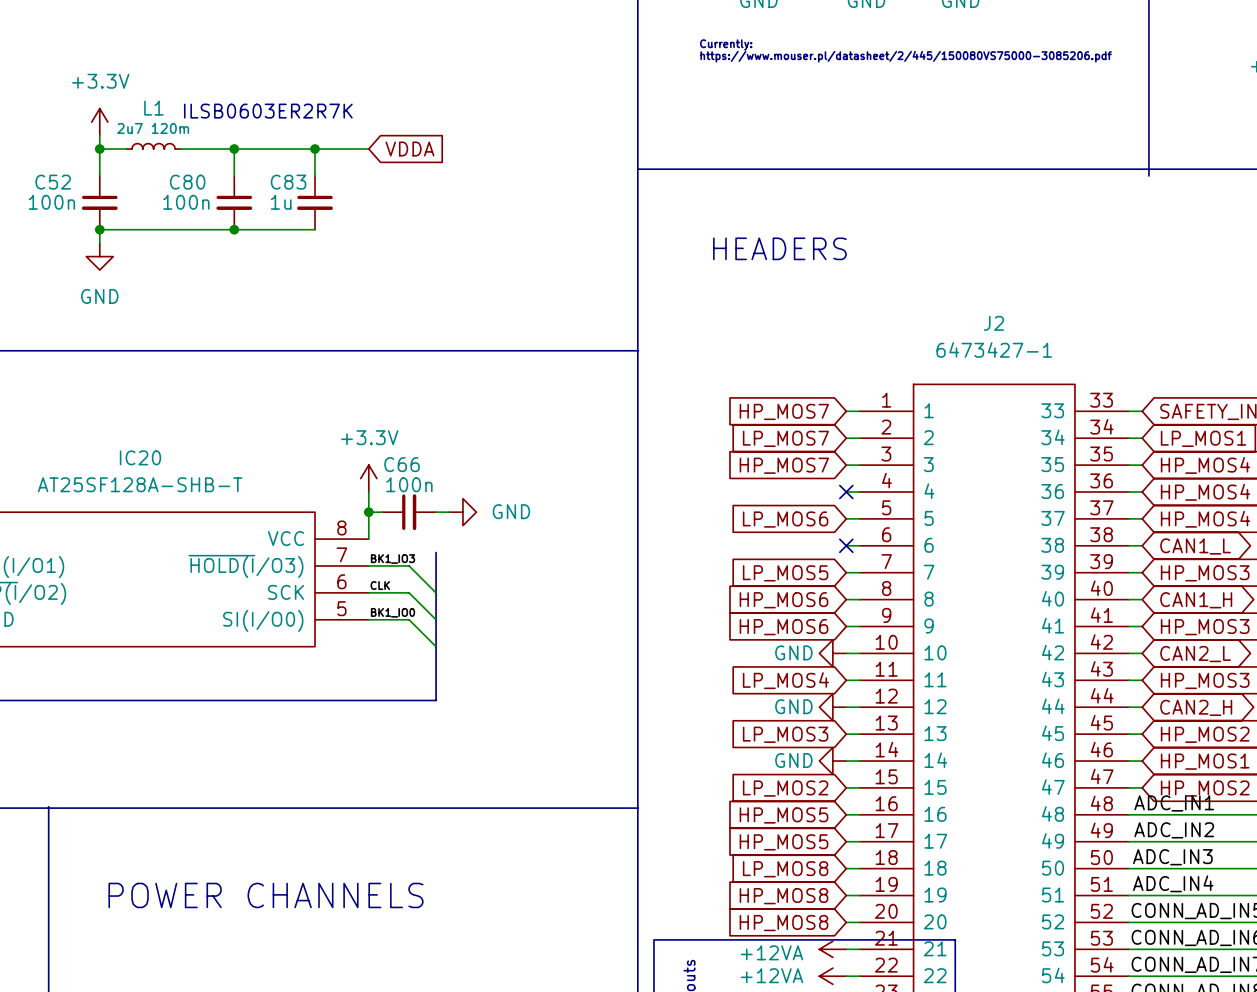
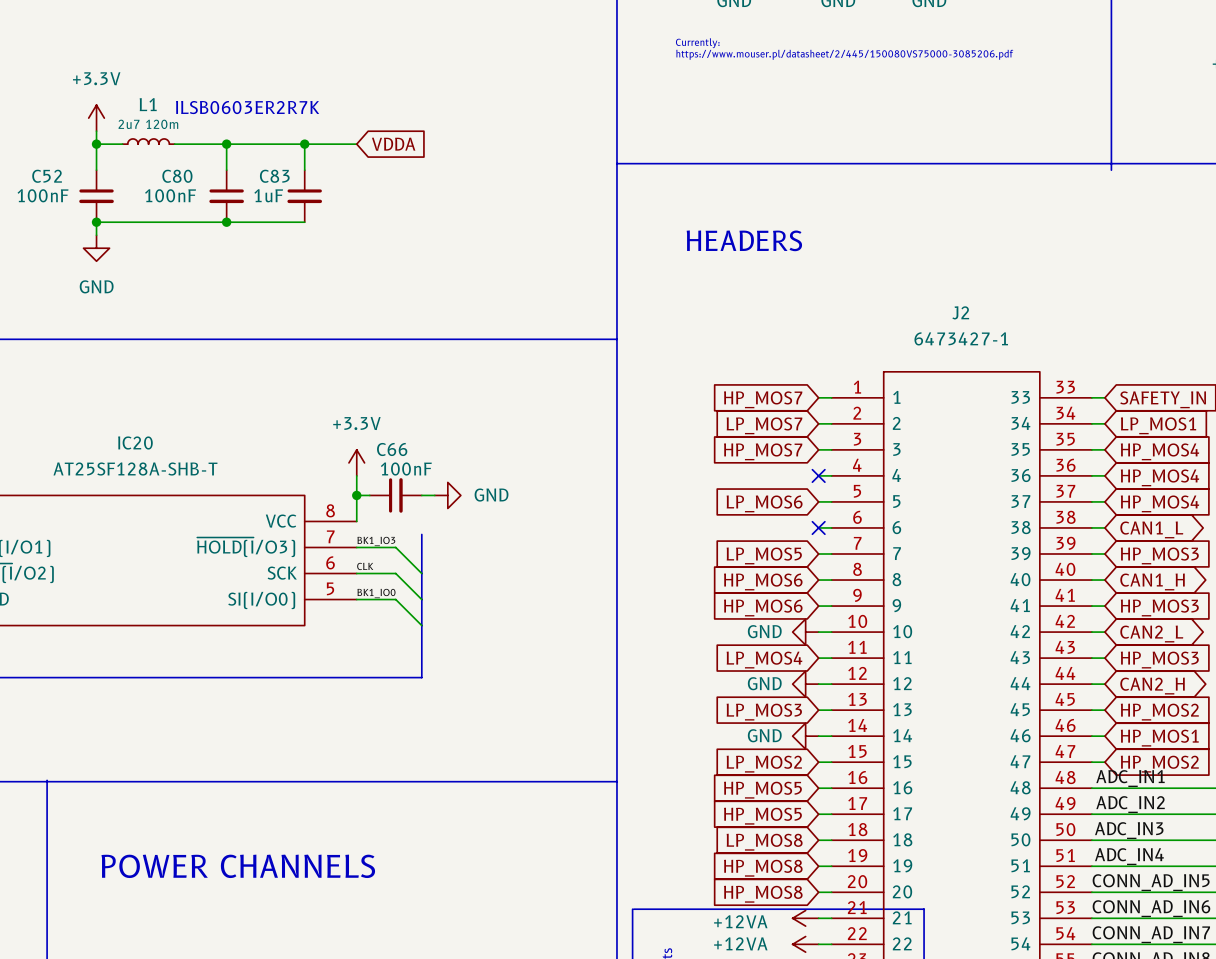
C52 value: 100n (51, 202) -> 100nF (43, 195)
C80 value: 100n (186, 202) -> 100nF (170, 195)
C83 value: 1u (281, 202) -> 1uF (268, 195)
C66 value: 100n (409, 484) -> 100nF (406, 469)

